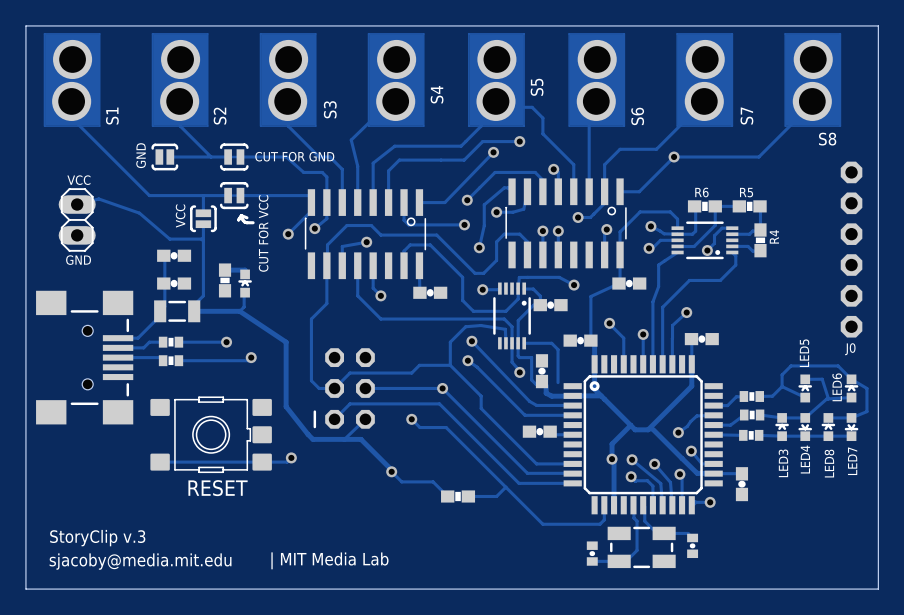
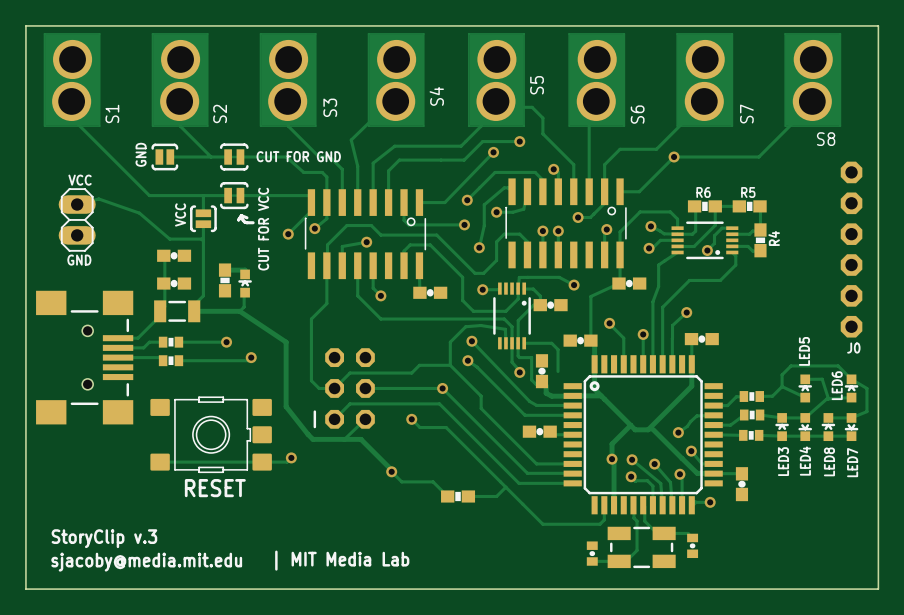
track: (558, 371) (558, 382) -> none

